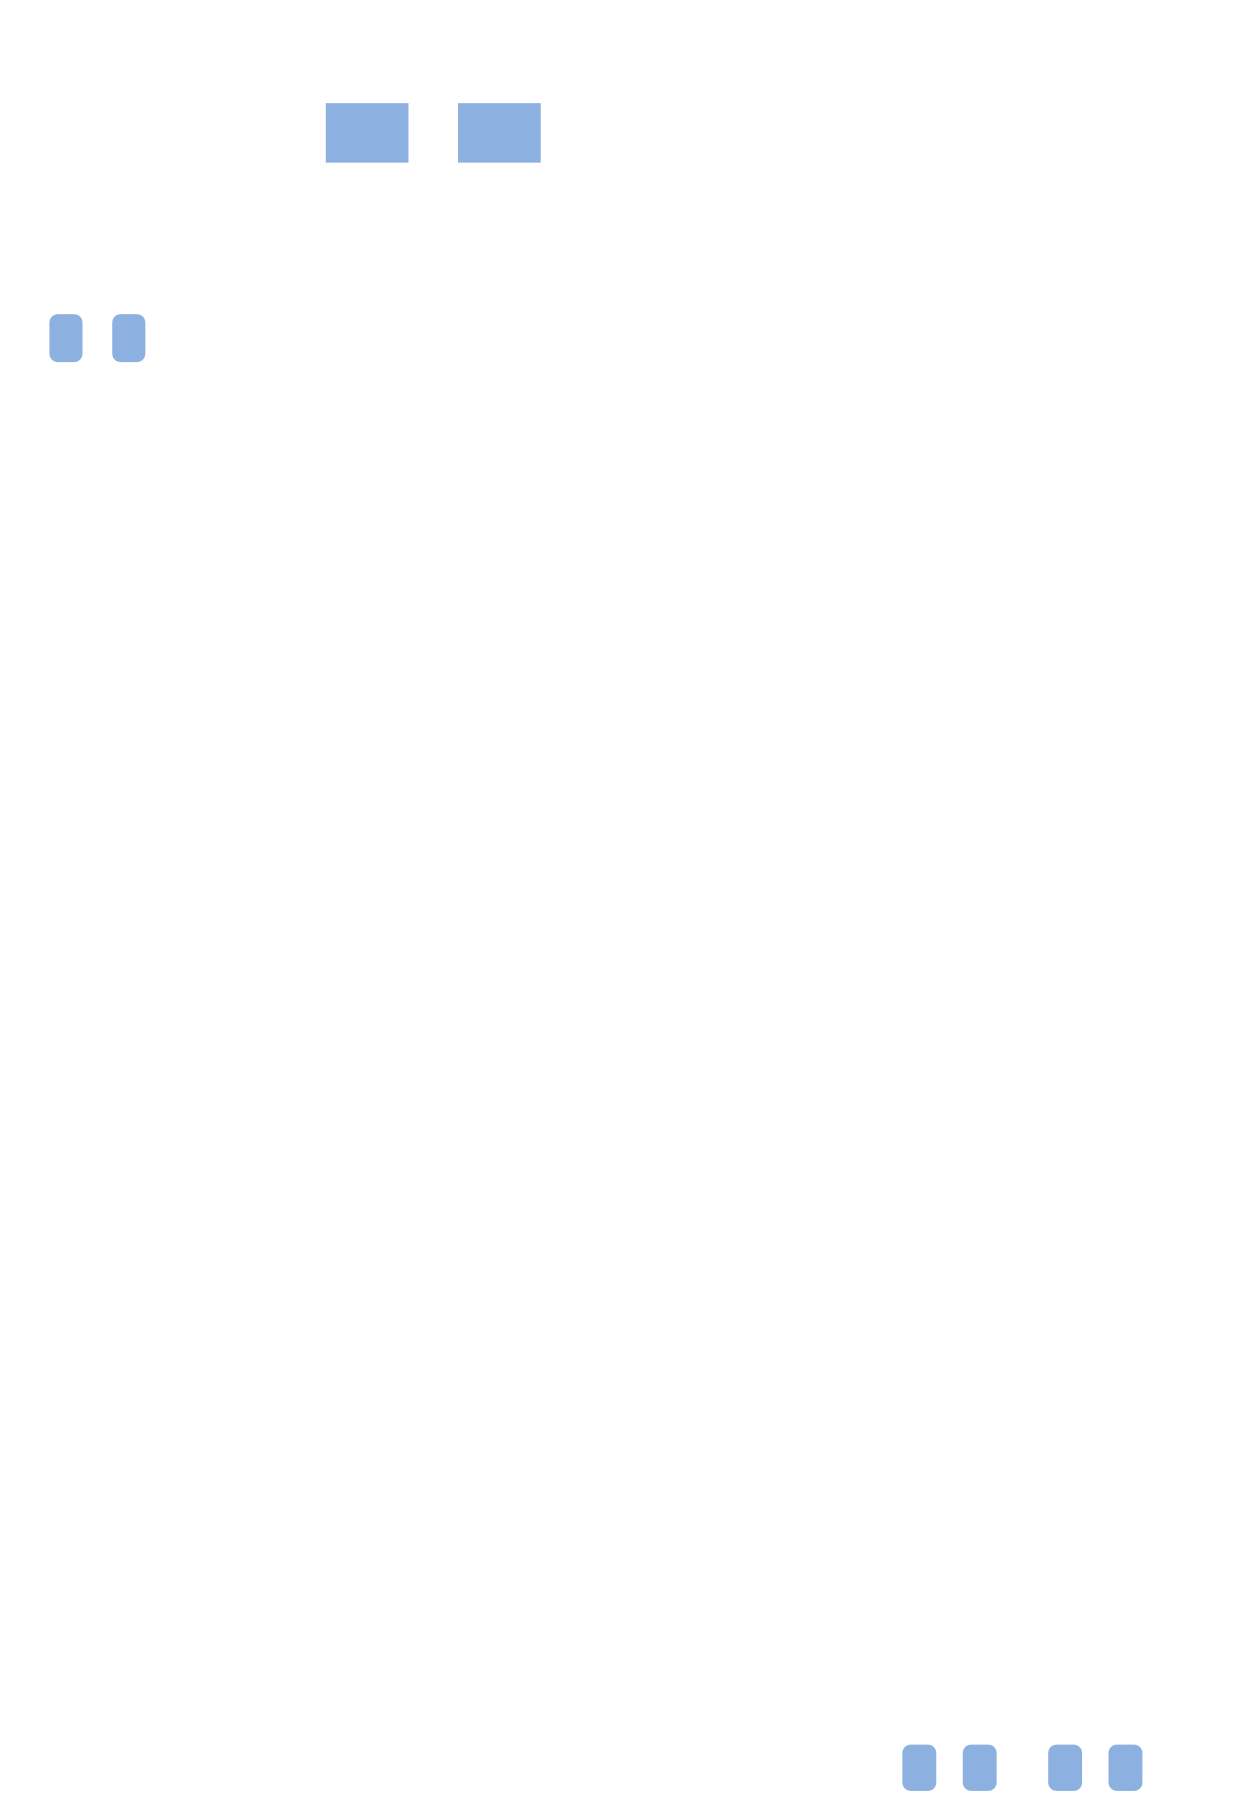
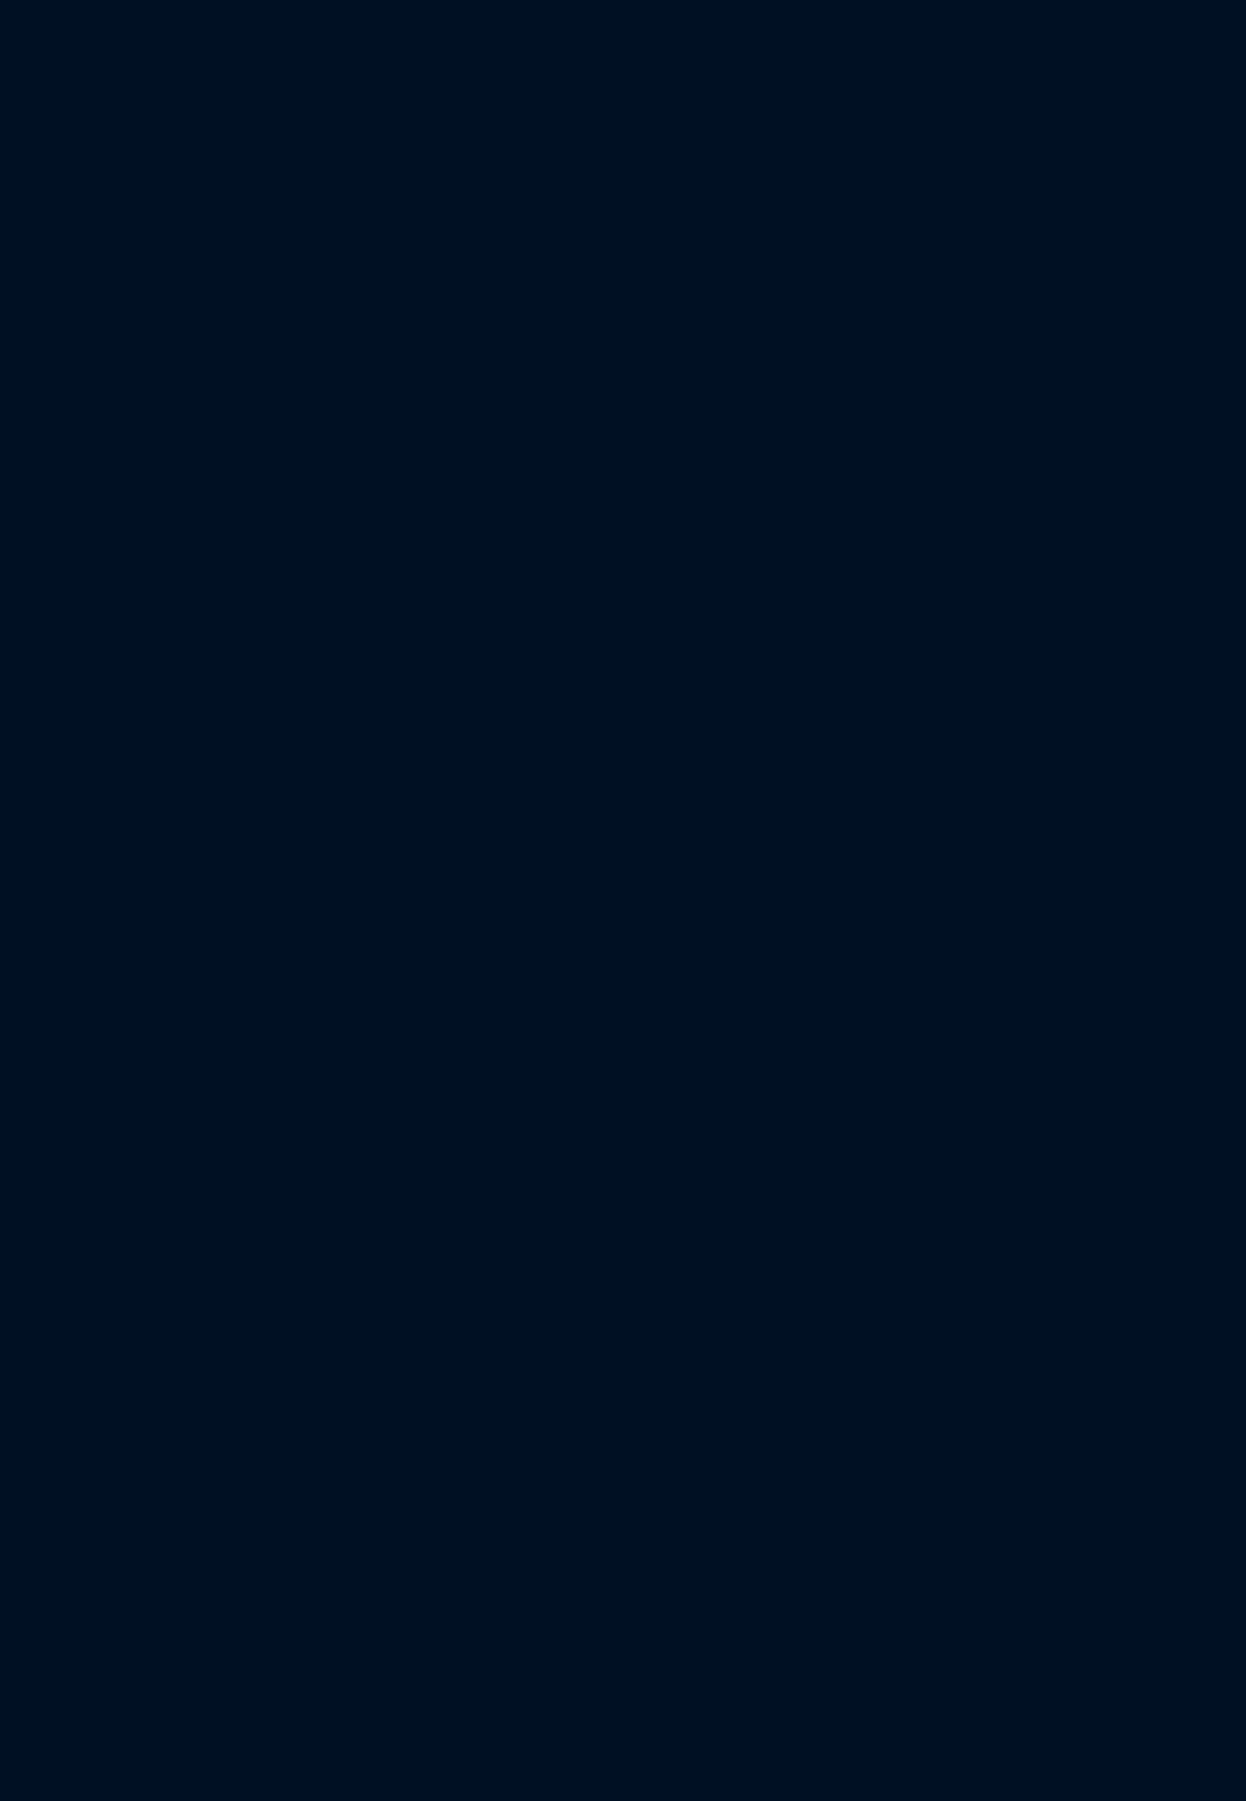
part: (433, 132) -> none
part: (97, 338) -> none
part: (949, 1767) -> none
part: (1095, 1767) -> none

